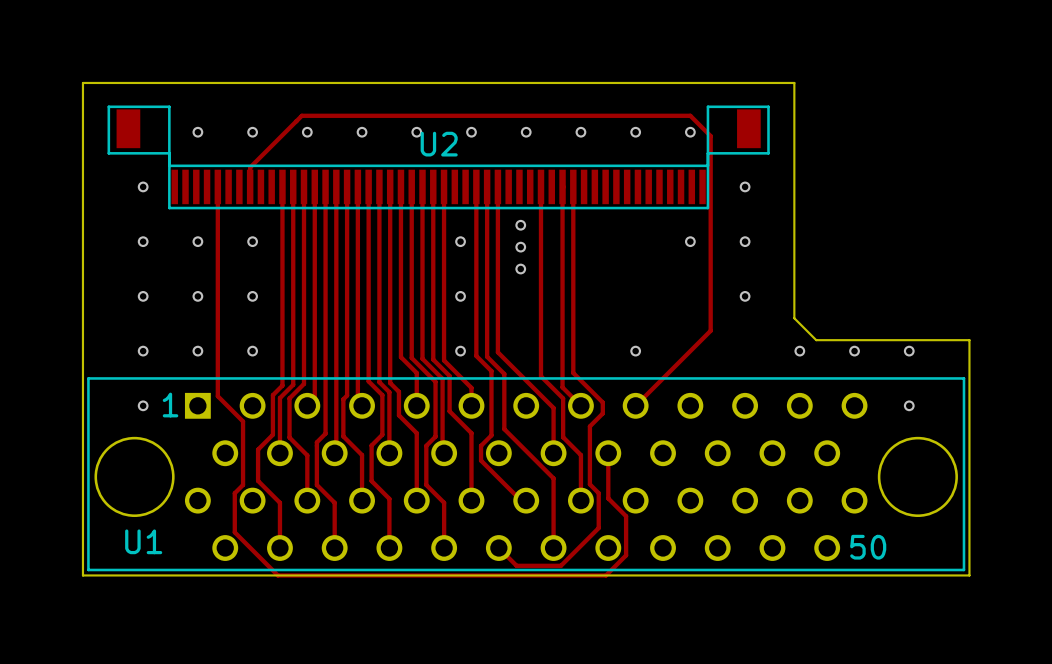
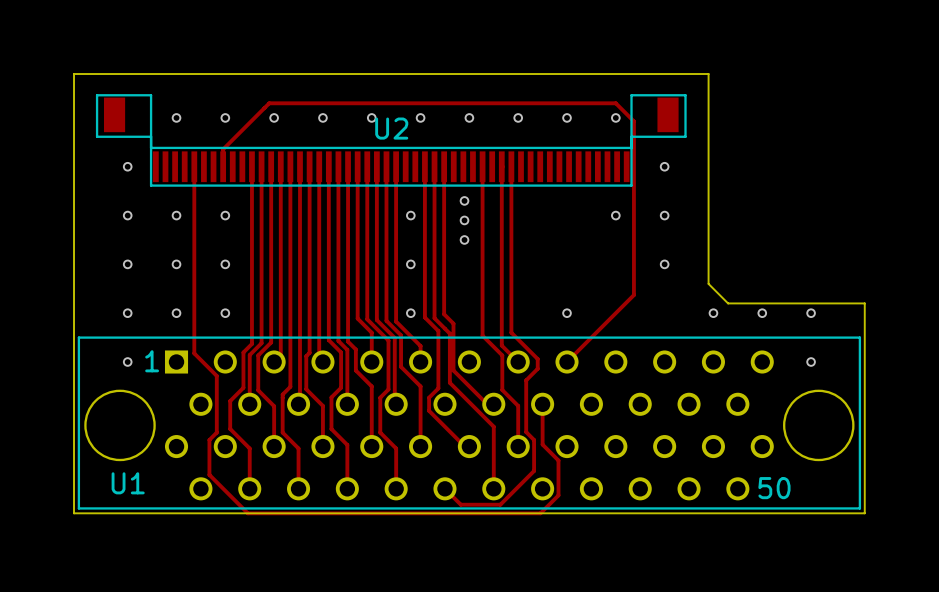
track: (508, 362) (553, 408) (553, 453) -> (453, 323) (453, 370) (487, 404) (493, 404)

